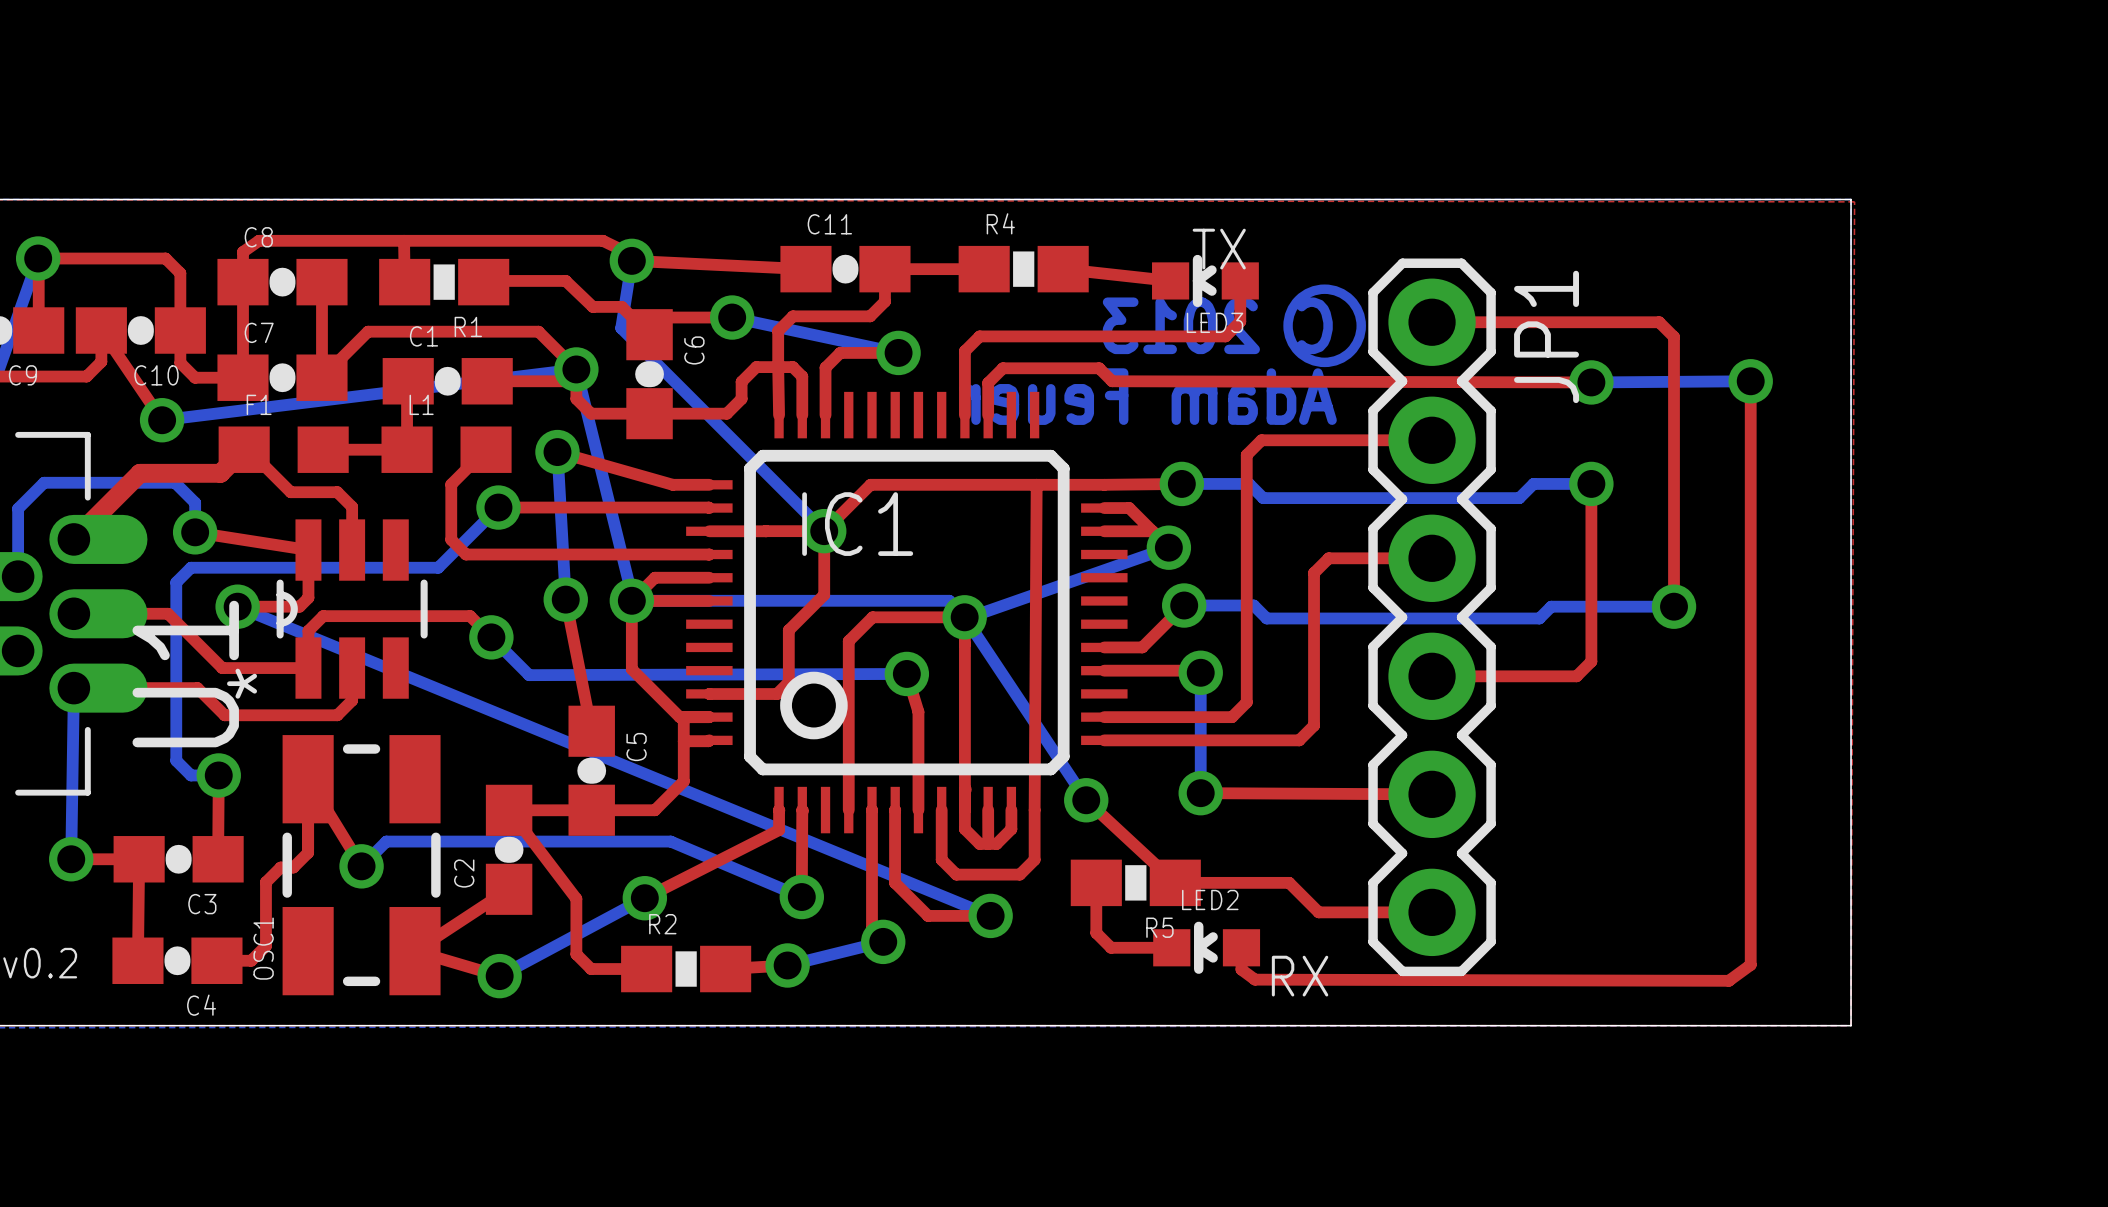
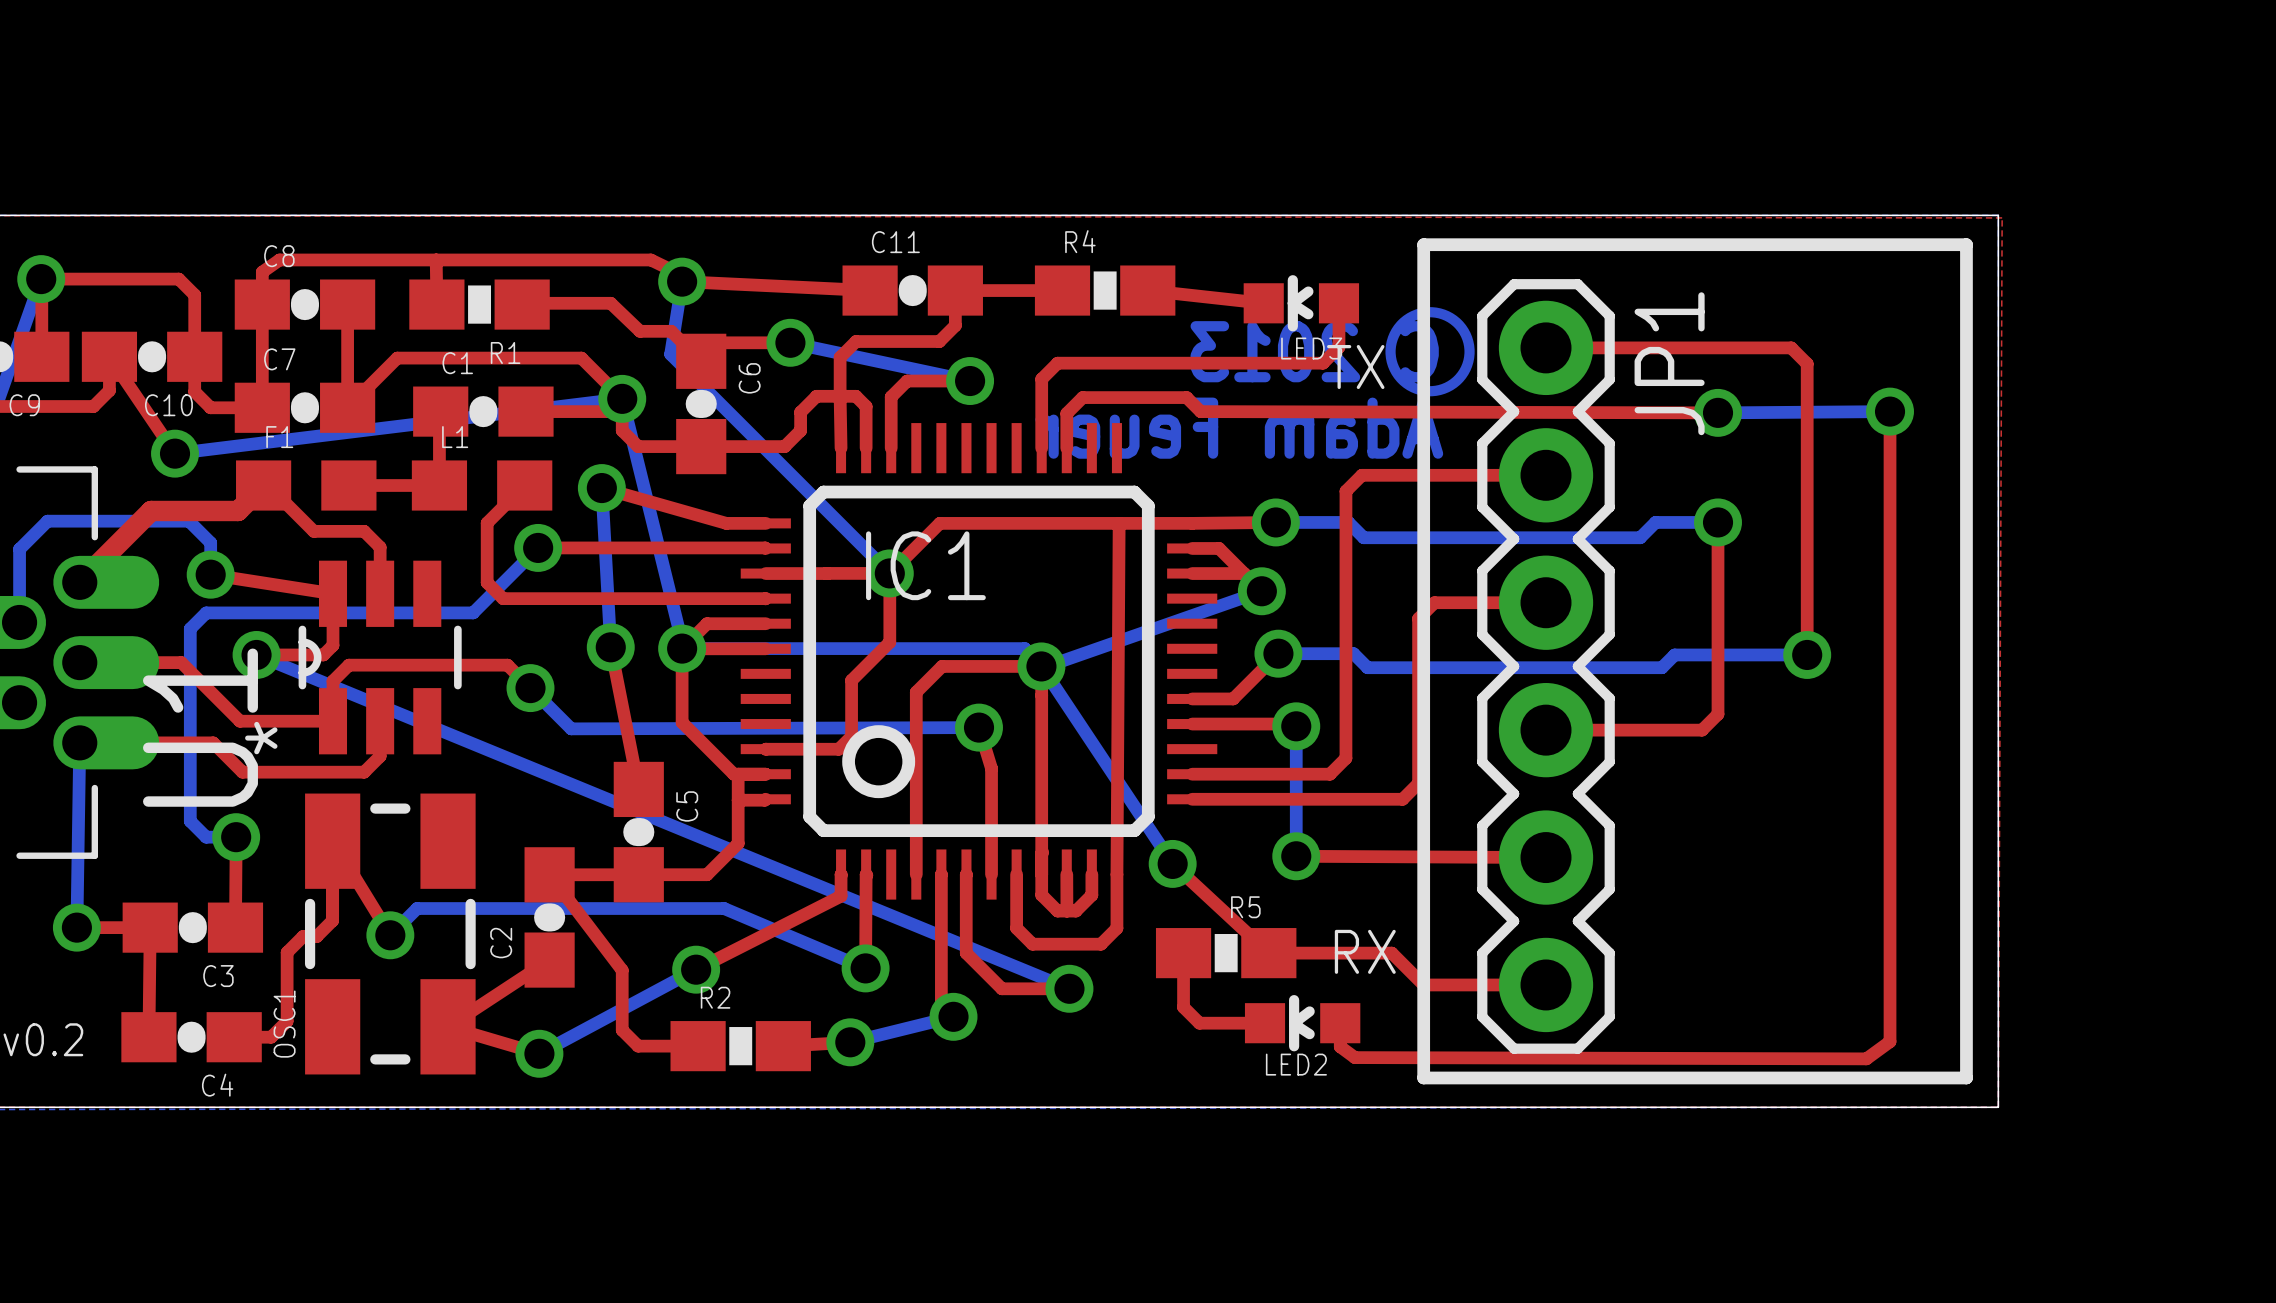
line: none -> (1423, 244) (1966, 244) (1966, 1077) (1423, 1077) (1423, 244)
text position: TX (1219, 249) -> TX (1355, 367)
LED2 name position: LED2 (1210, 899) -> LED2 (1296, 1064)
R5 name position: R5 (1159, 927) -> R5 (1245, 907)
text position: RX (1300, 976) -> RX (1365, 951)

